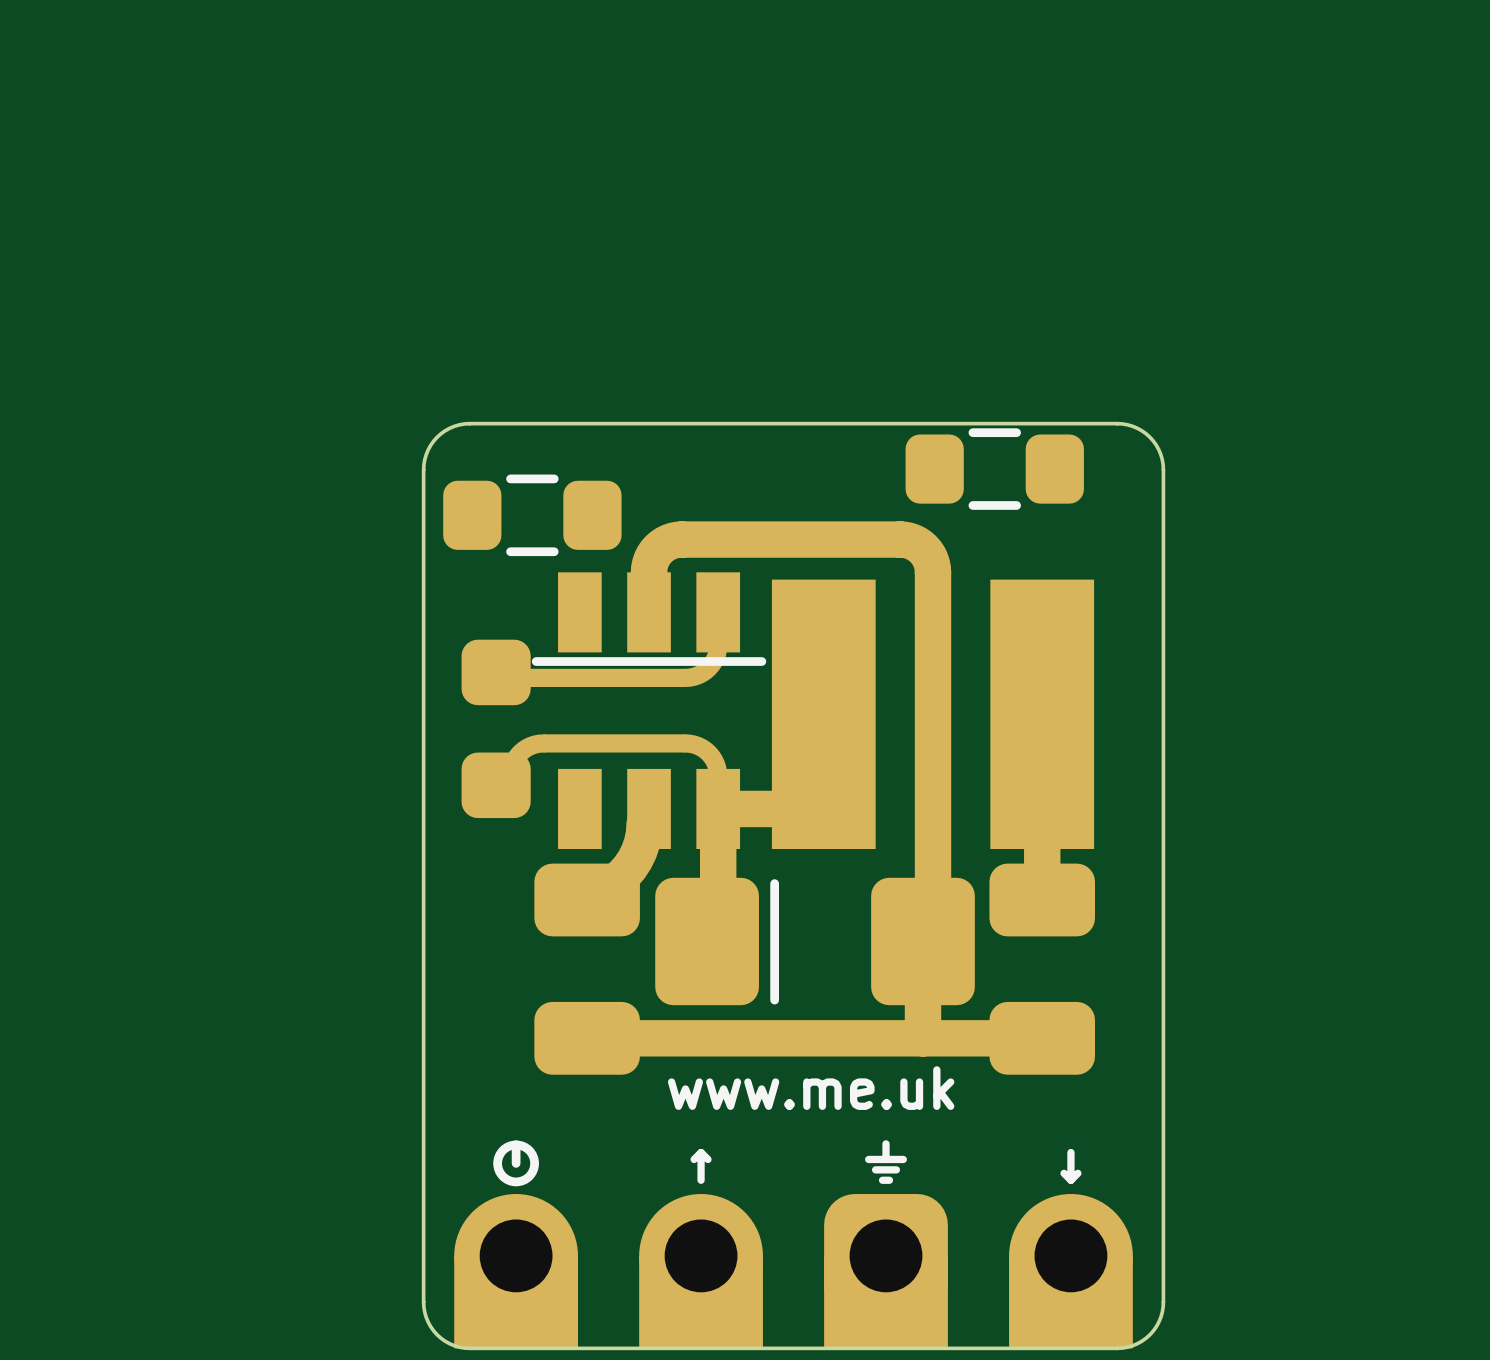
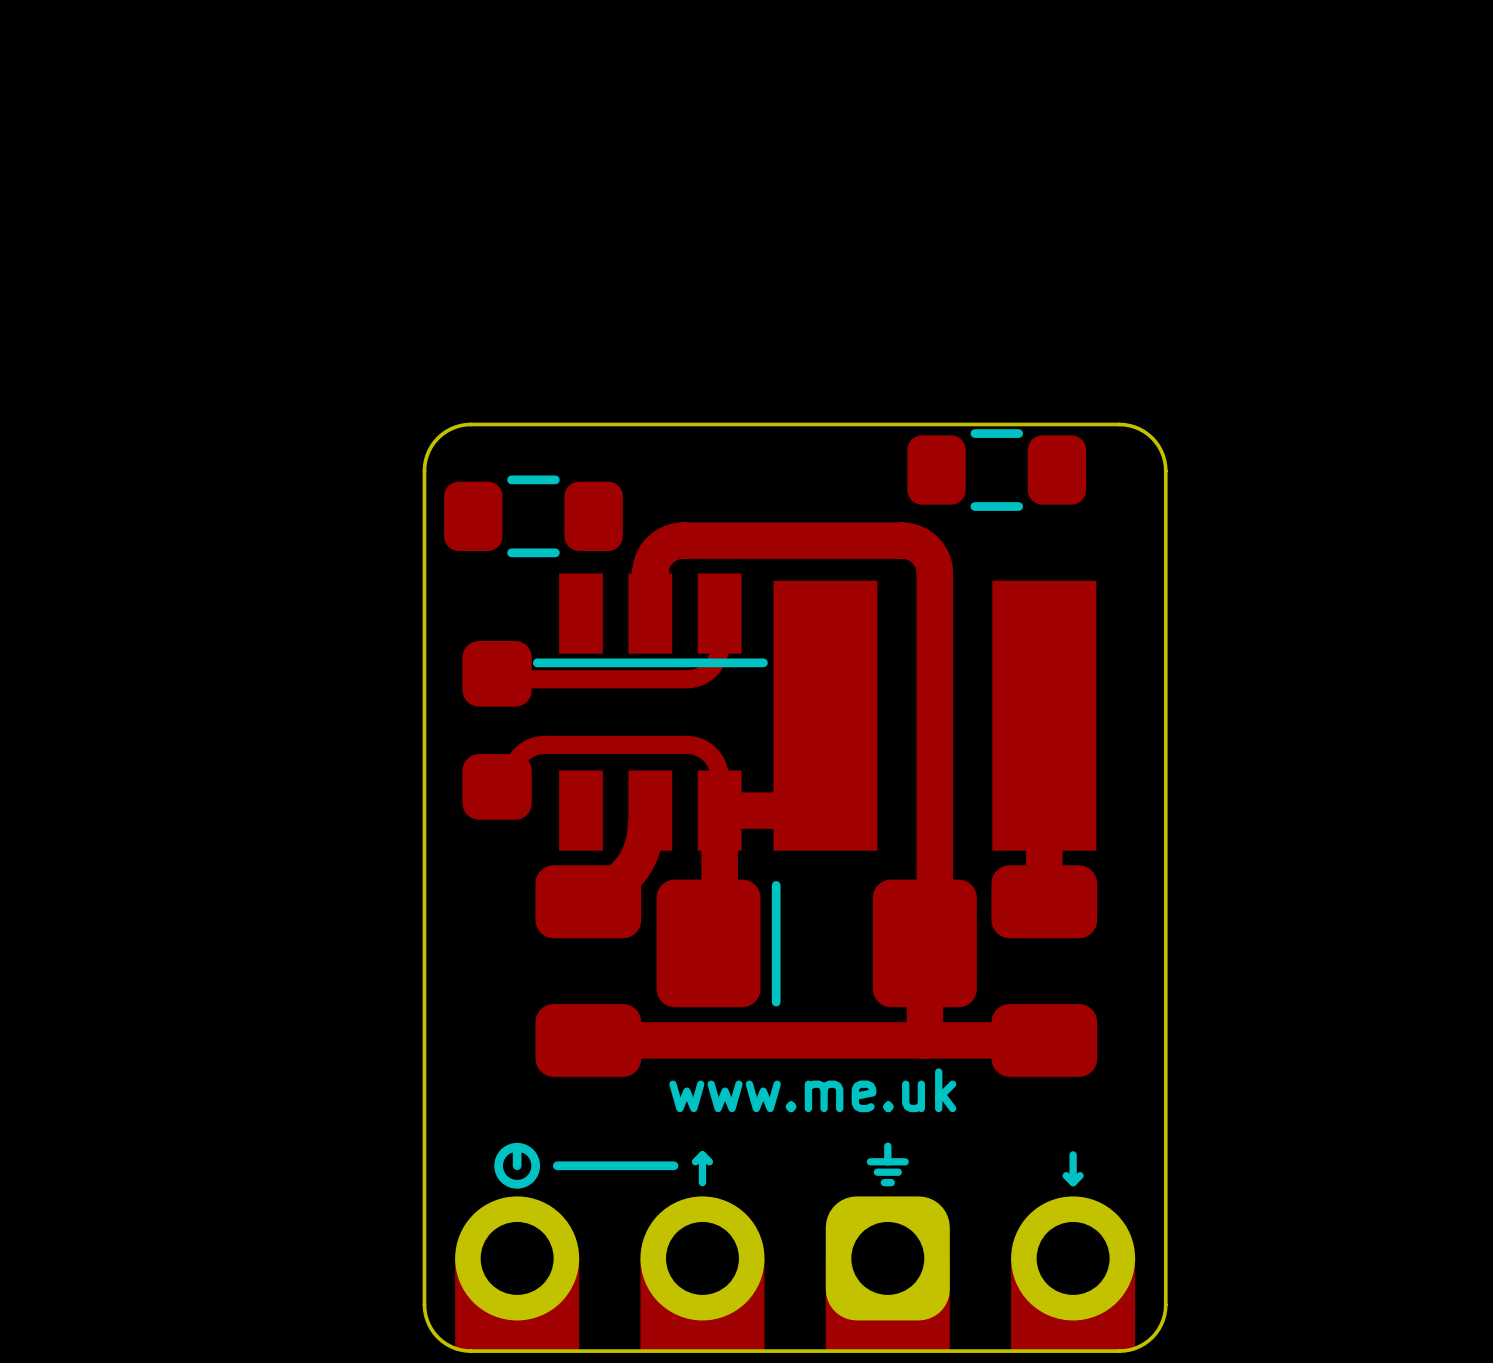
line: none -> (557, 1165) (674, 1165)

